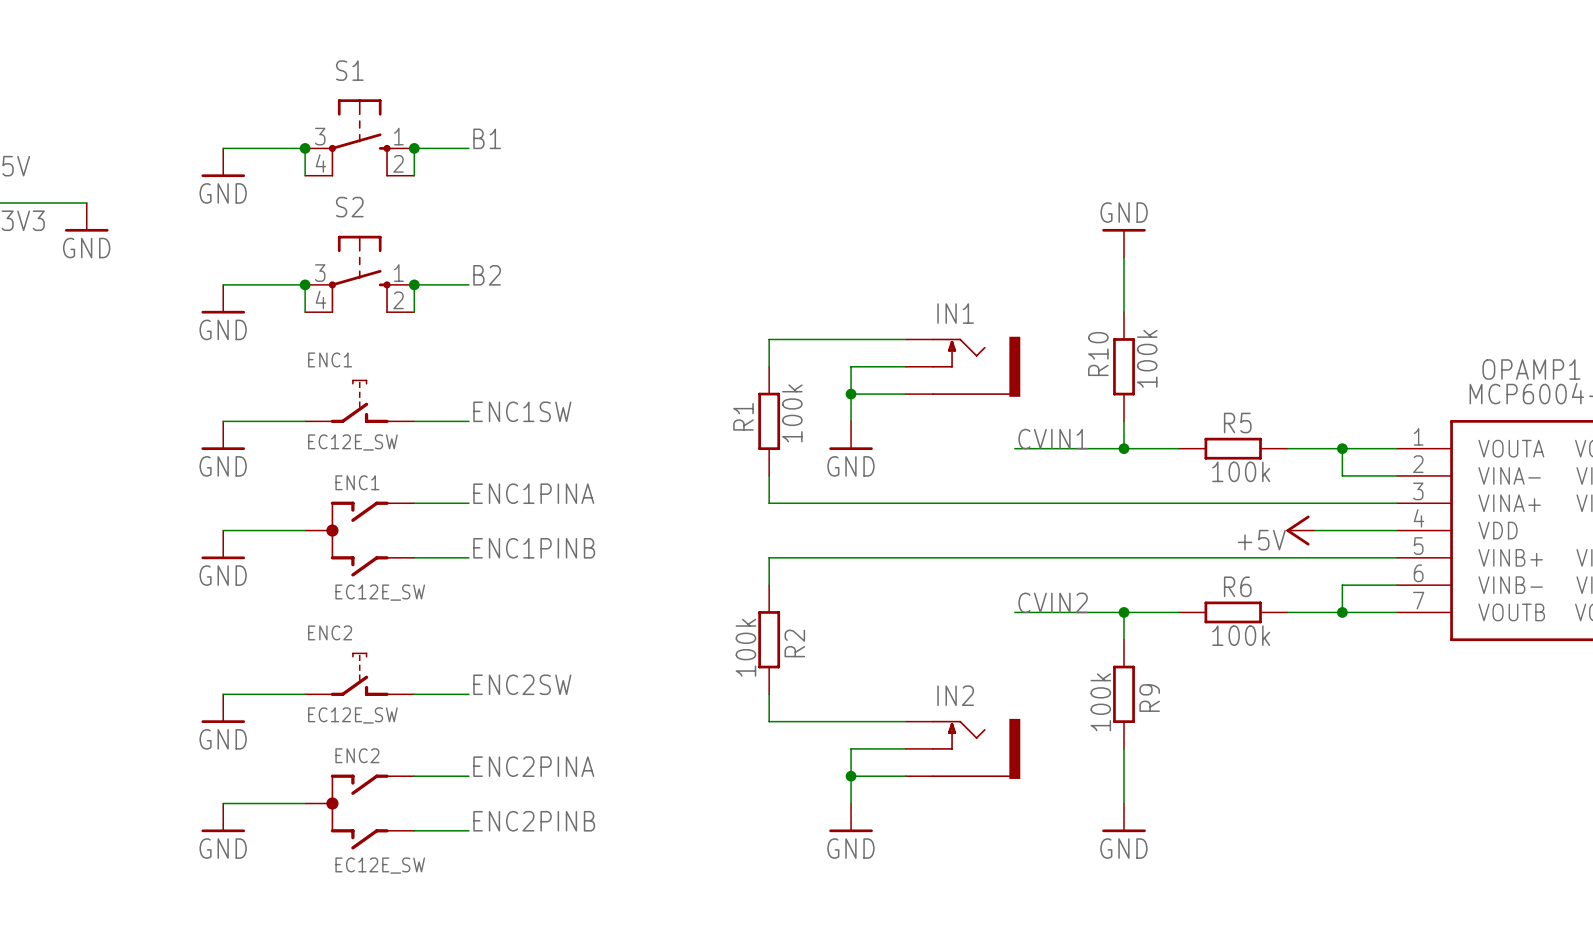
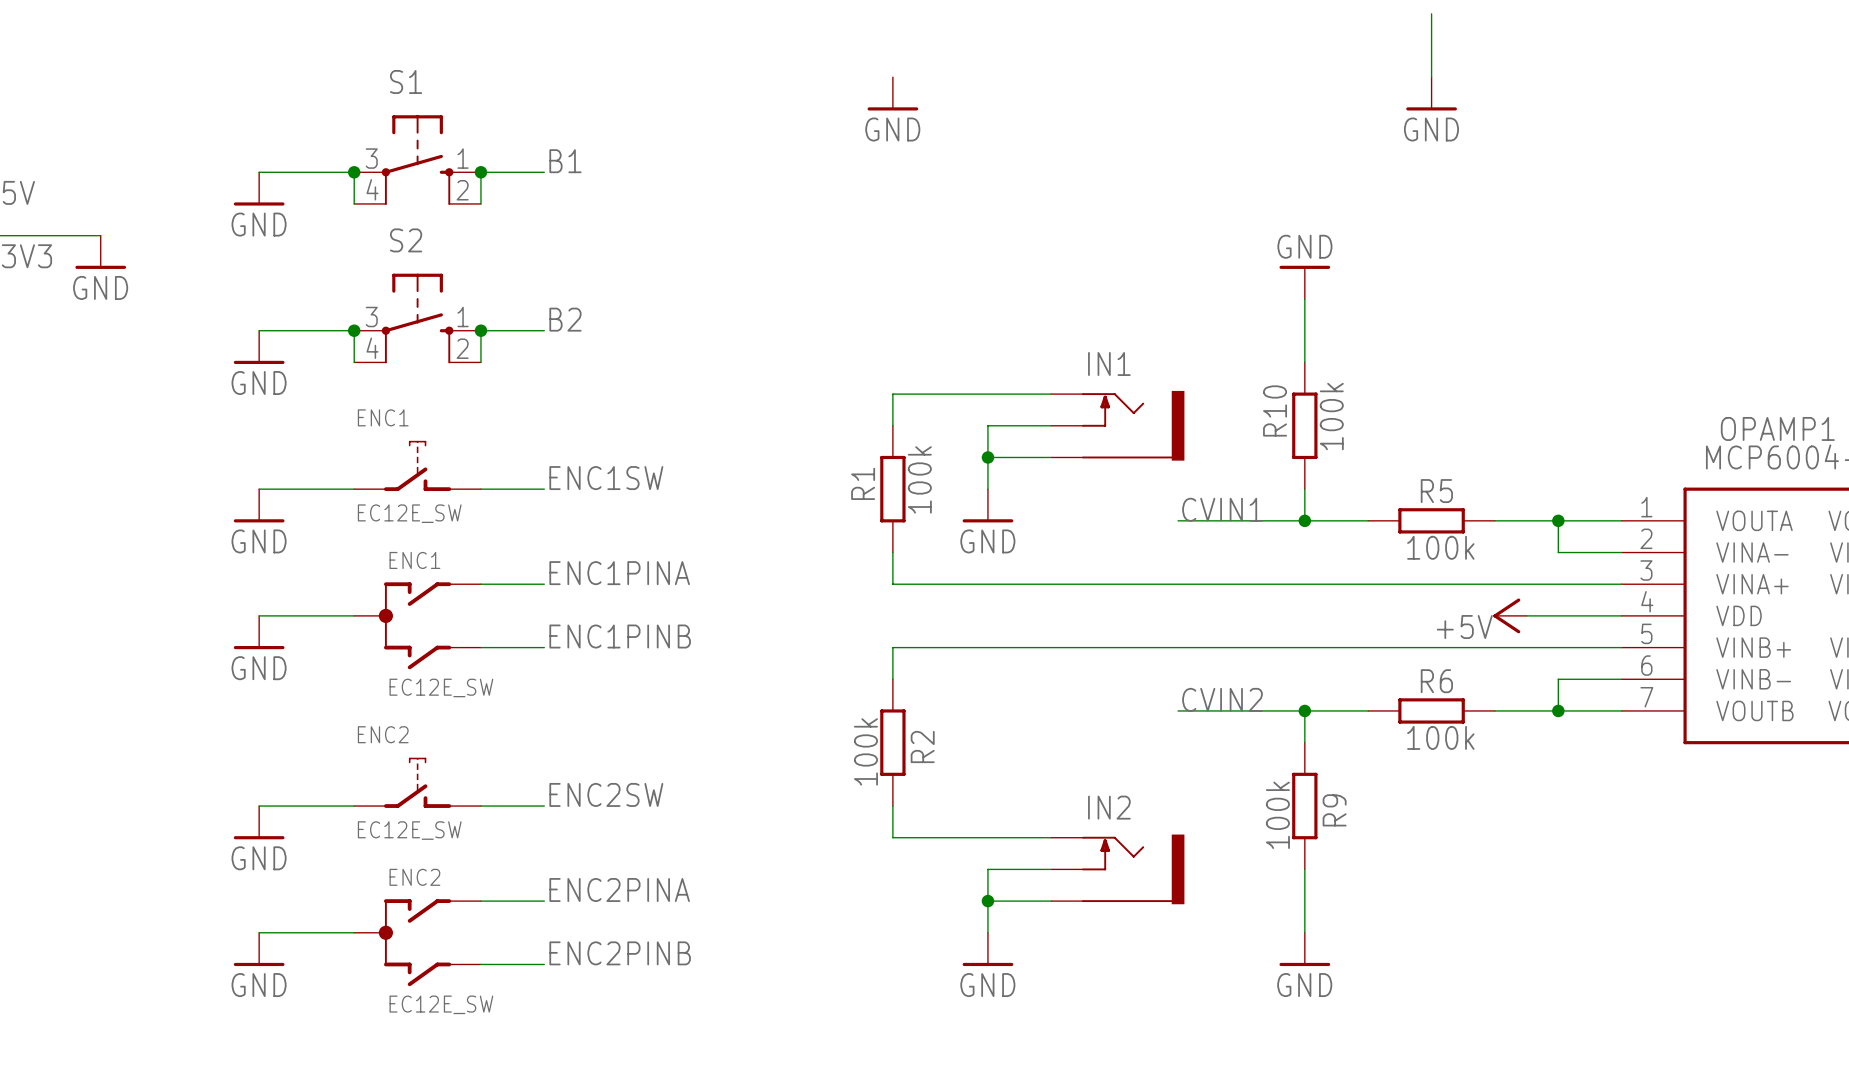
wire: none -> (1431, 13) (1431, 77)
power symbol: none -> GND (892, 93)
power symbol: none -> GND (1431, 93)

